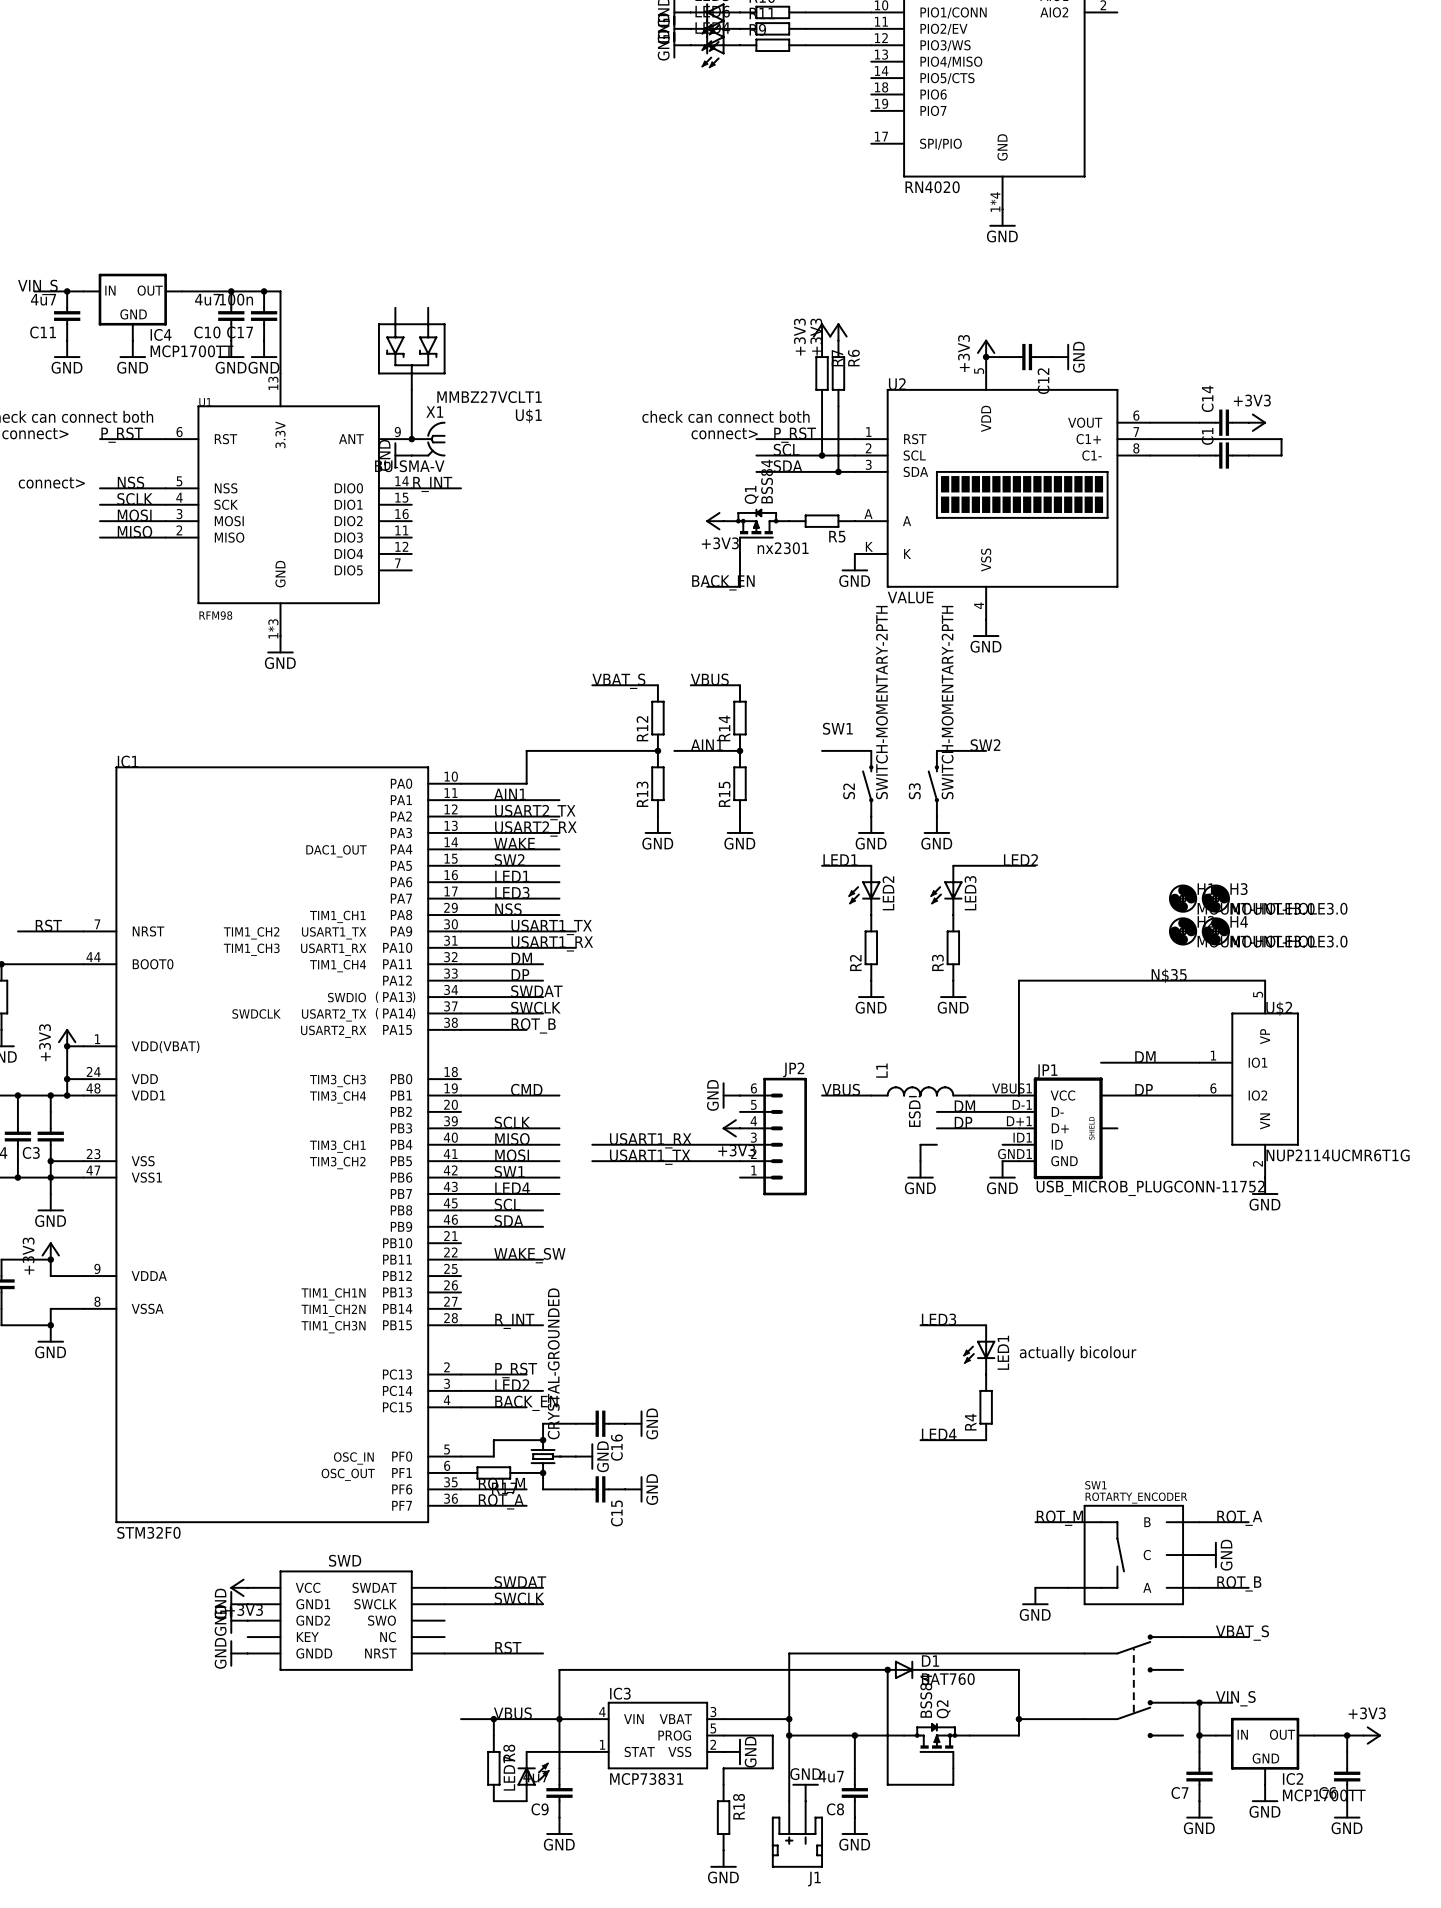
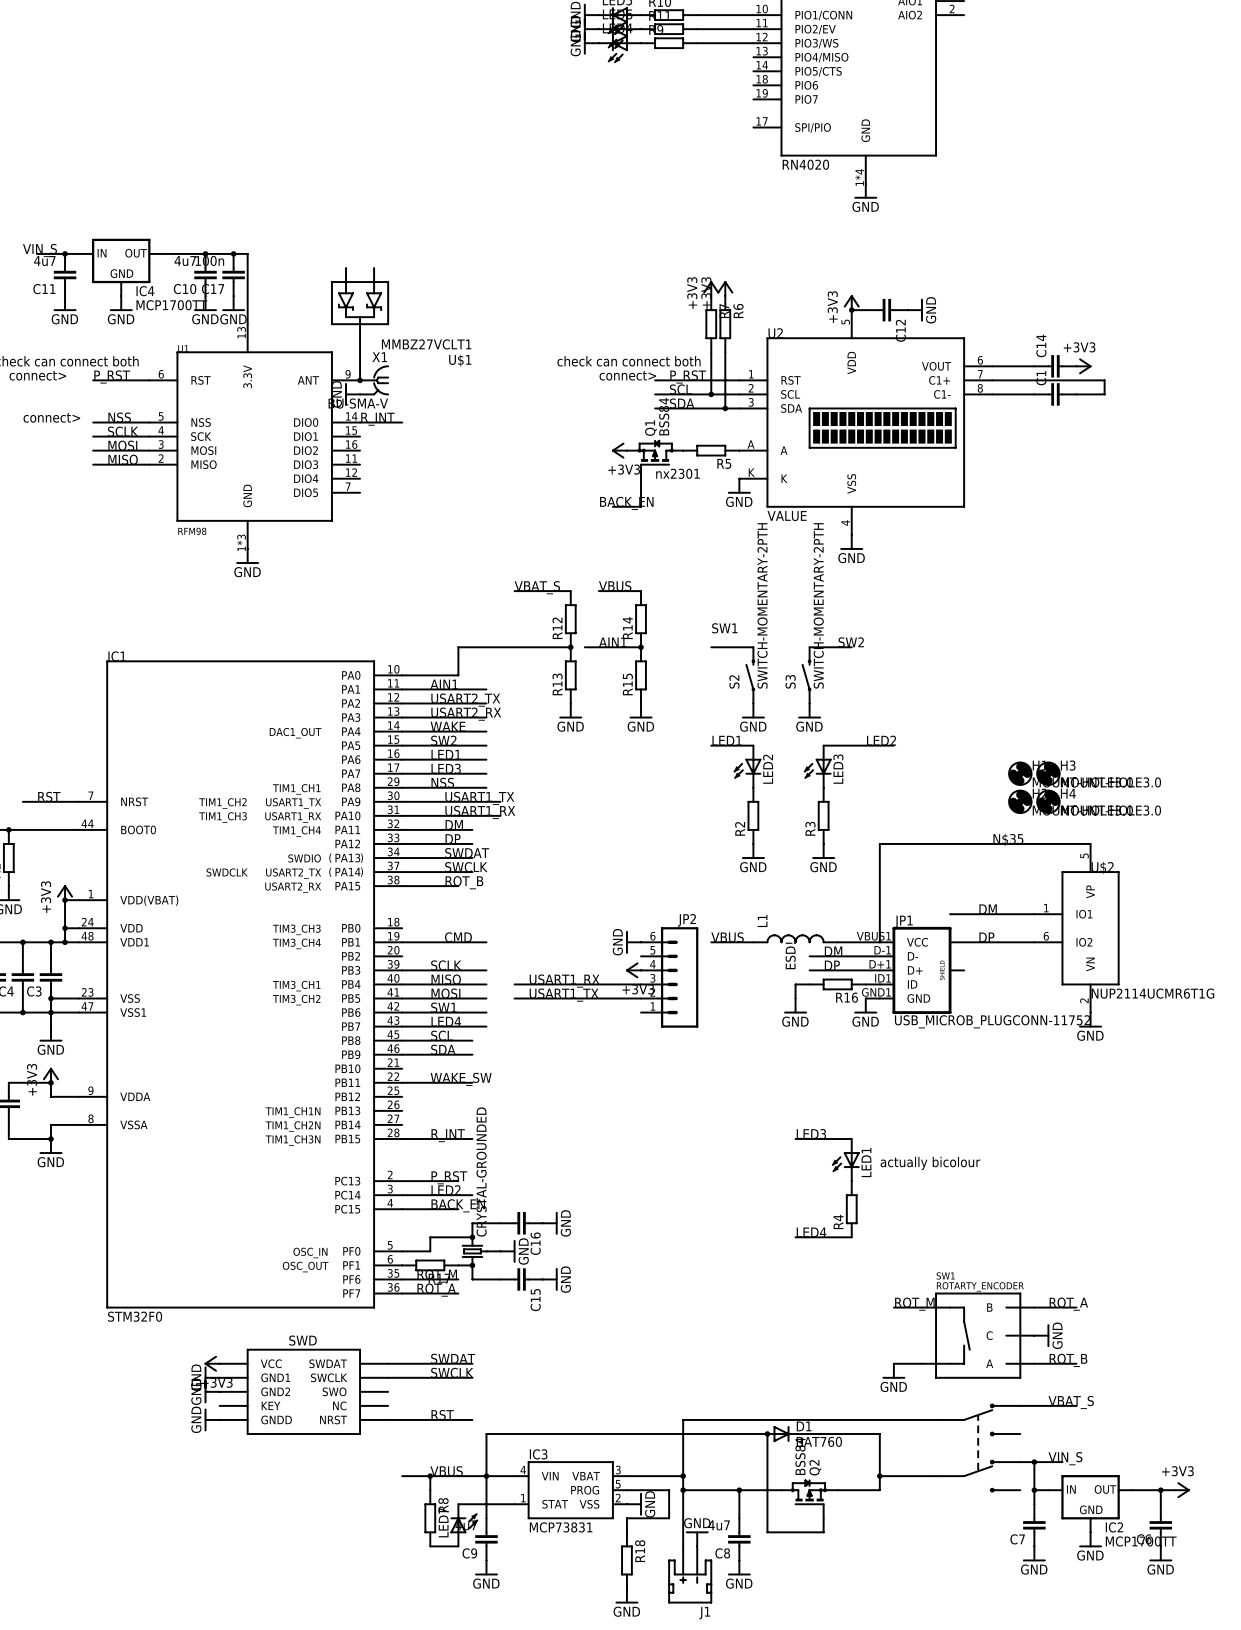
R16: none -> (837, 984)

